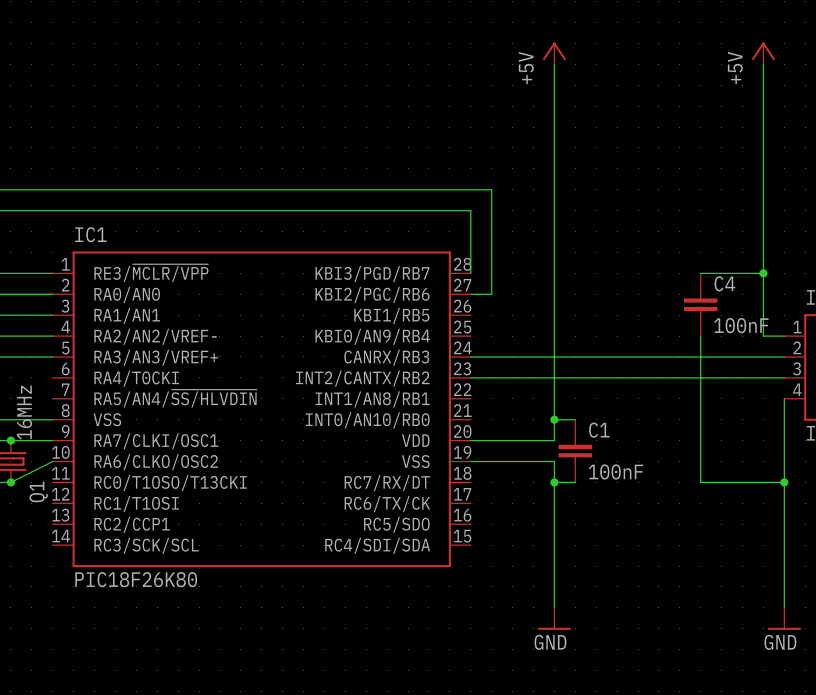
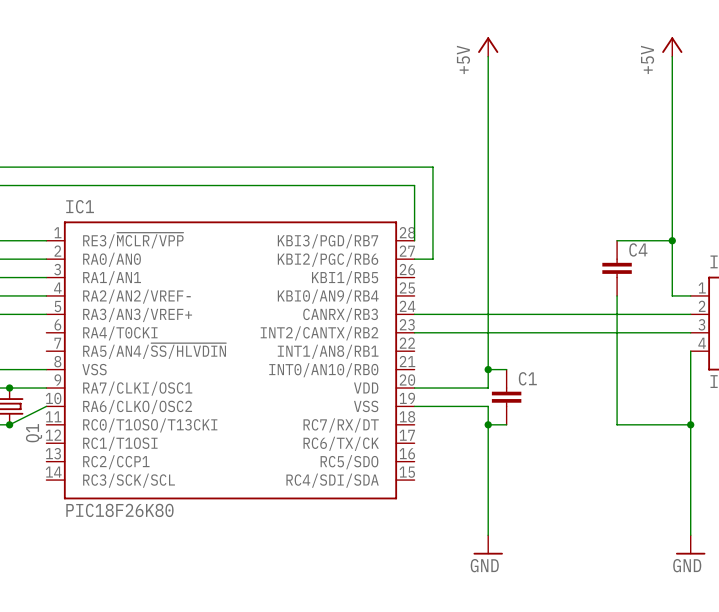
C4 value: 100nF (741, 325) -> none
Q1 value: 16MHz (24, 412) -> none
C1 value: 100nF (615, 471) -> none

